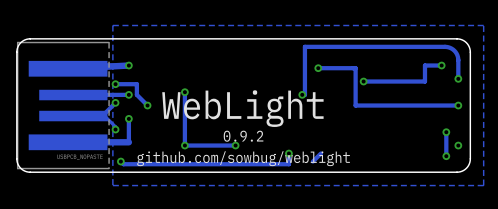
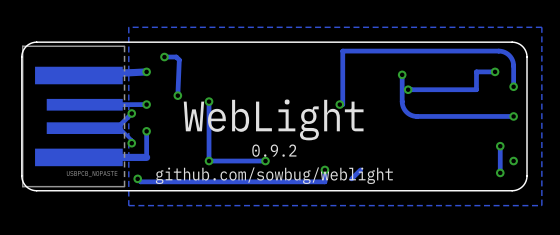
track: none -> (164, 57) (176, 57) (179, 60) (177, 95)
via: none -> (164, 57)
track: (318, 68) (355, 68) (355, 105) (371, 105) -> (402, 74) (403, 107) (408, 113) (417, 116)
via position: (318, 68) -> (402, 74)
track: (115, 84) (136, 84) (136, 94) (147, 105) -> none
via: (115, 84) -> none
via: none -> (177, 95)
via: (147, 105) -> none

